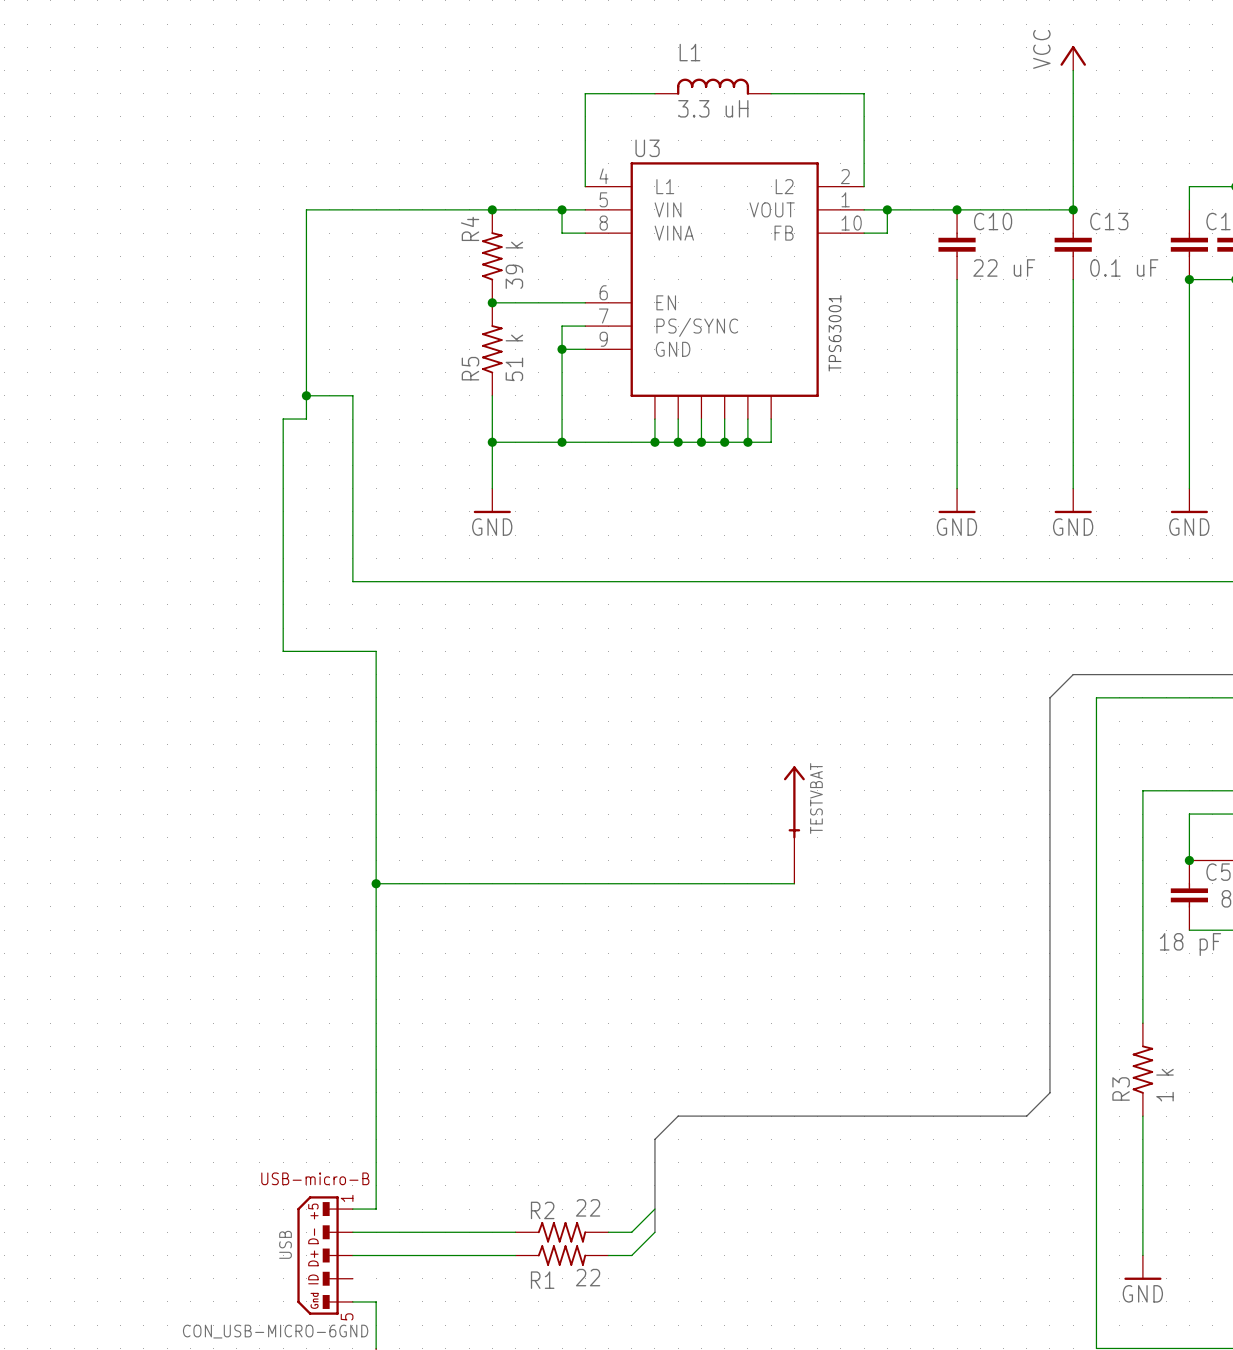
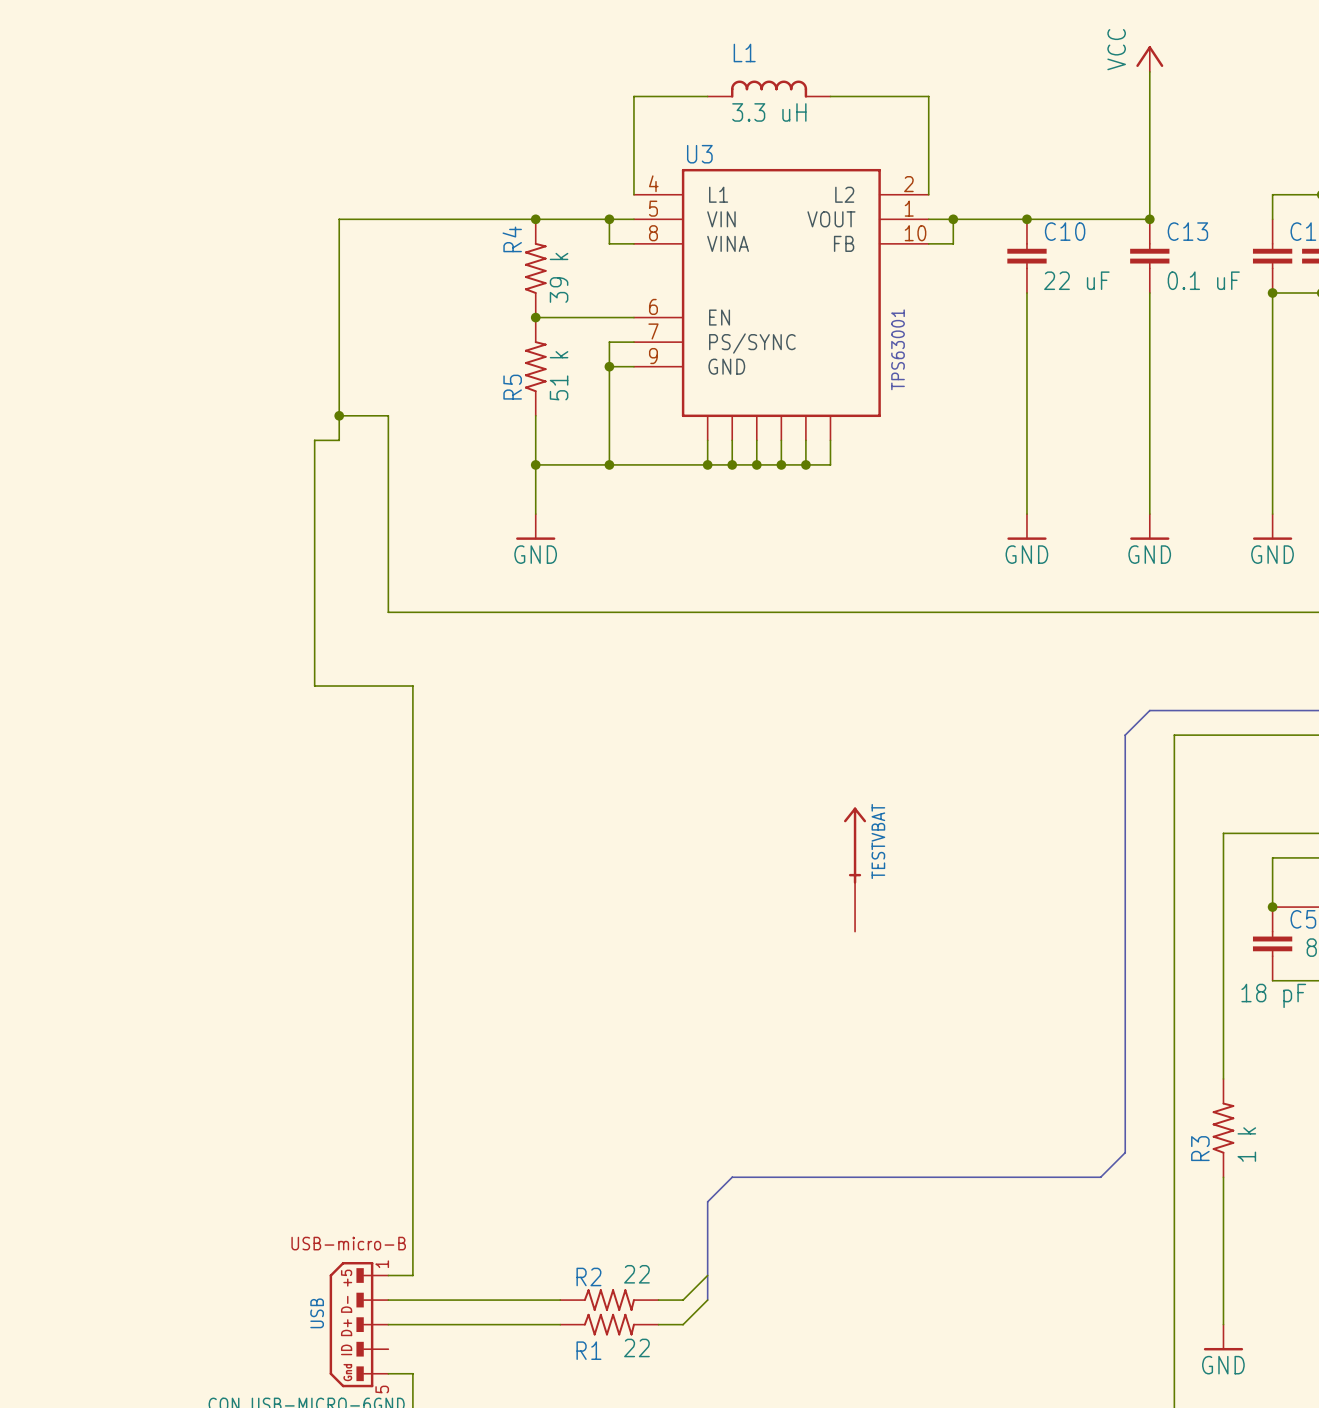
wire: (376, 883) (794, 883) -> none
junction: (376, 883) -> none

